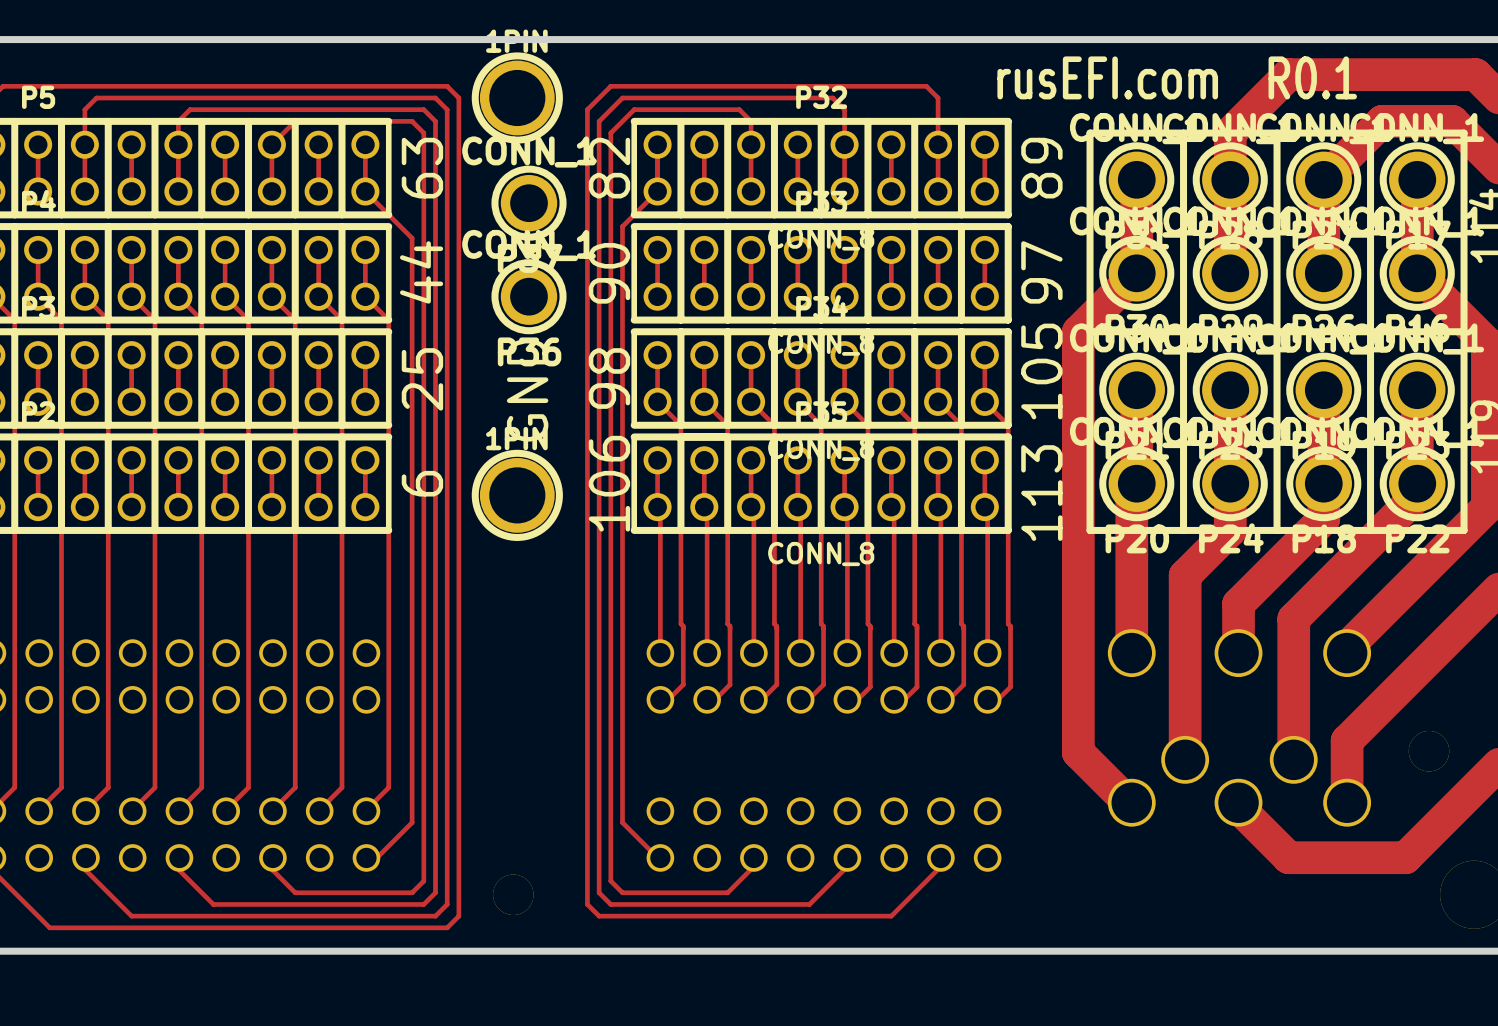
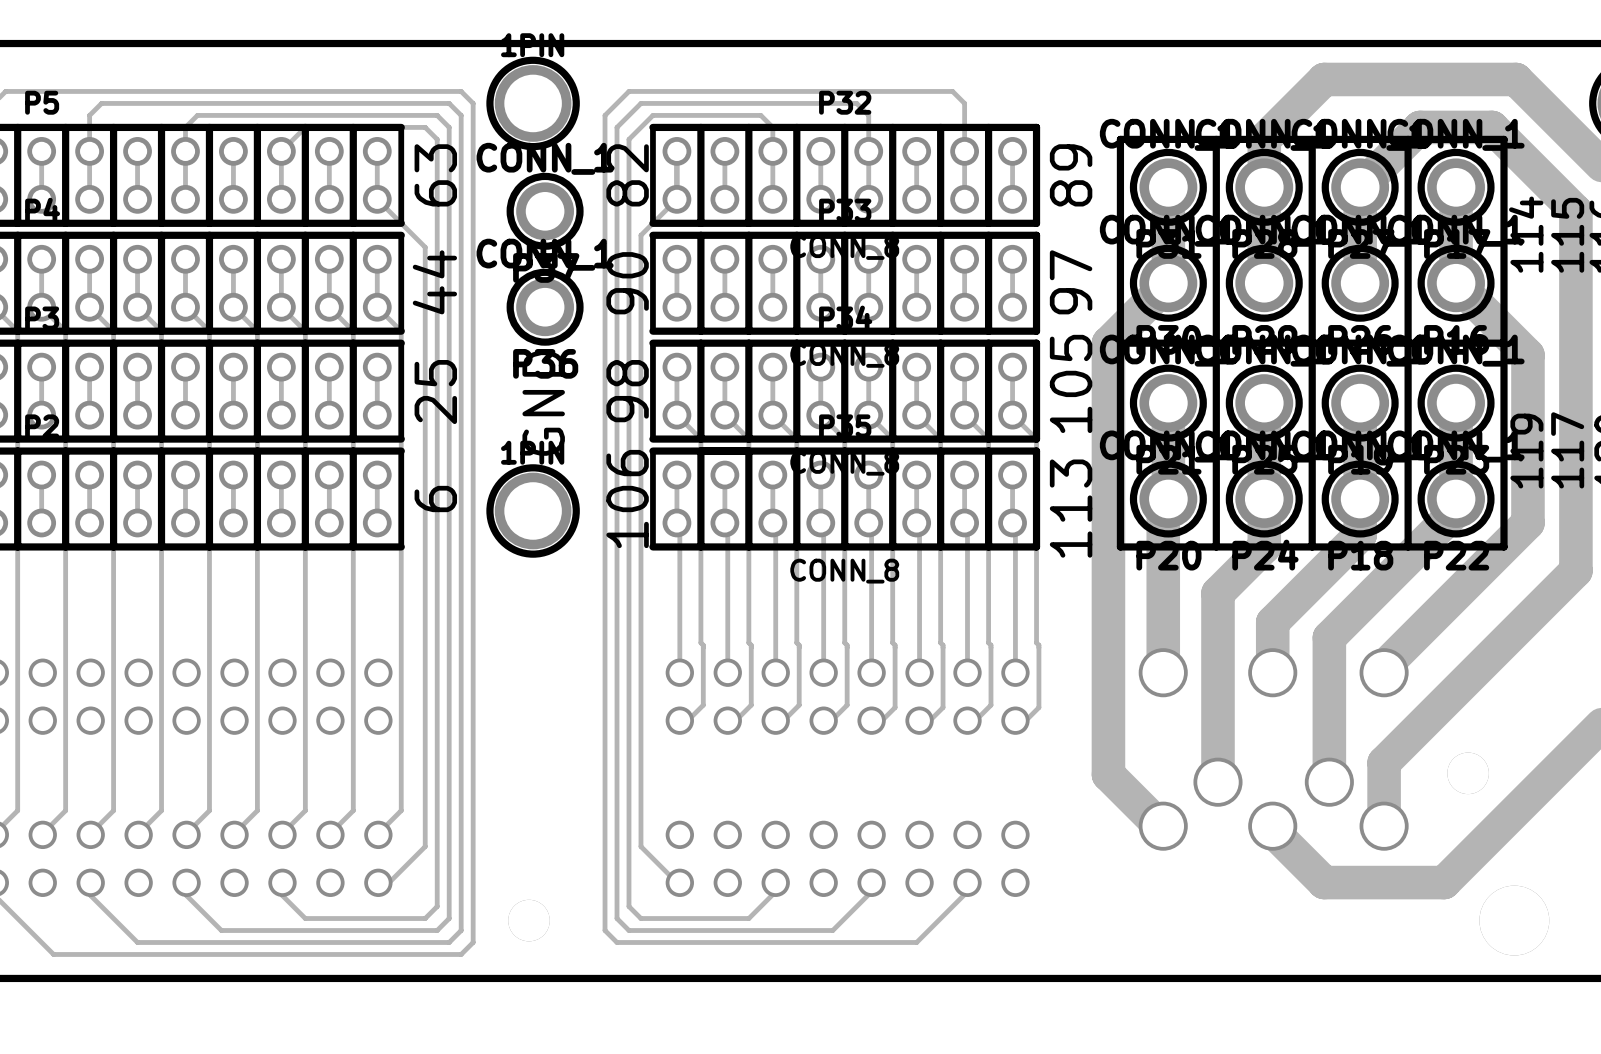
text: rusEFI.com R0.1 (1177, 77) -> none

